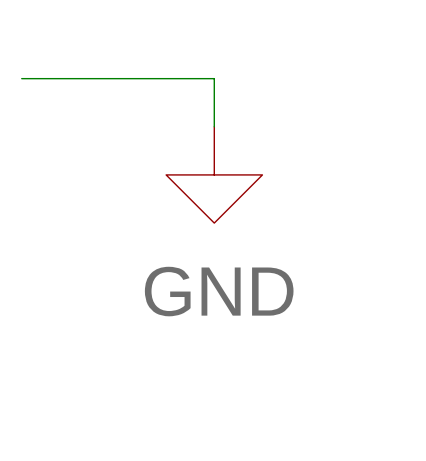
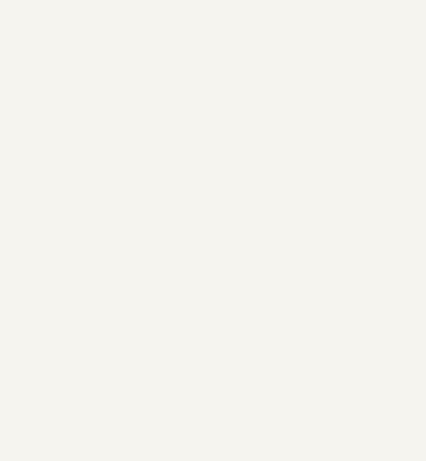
wire: (21, 78) (214, 78) (214, 126) -> none
power symbol: GND (214, 174) -> none

